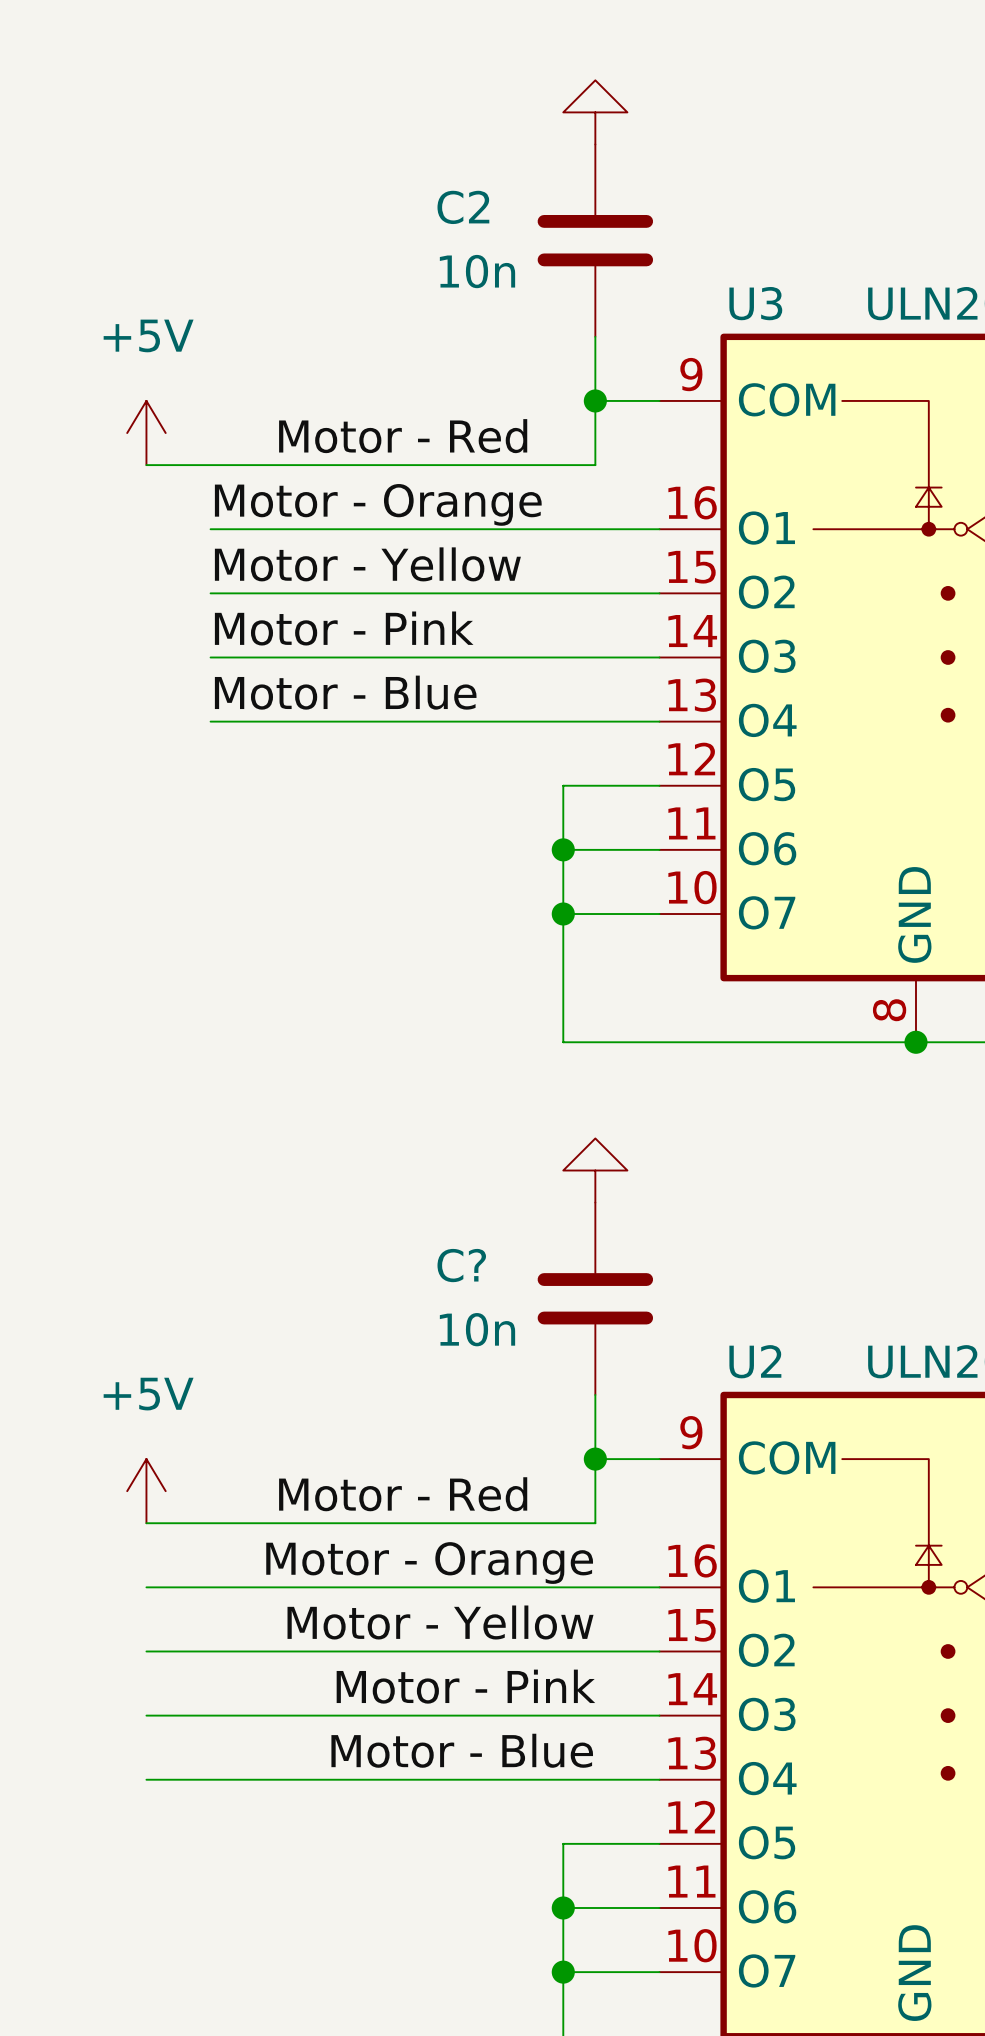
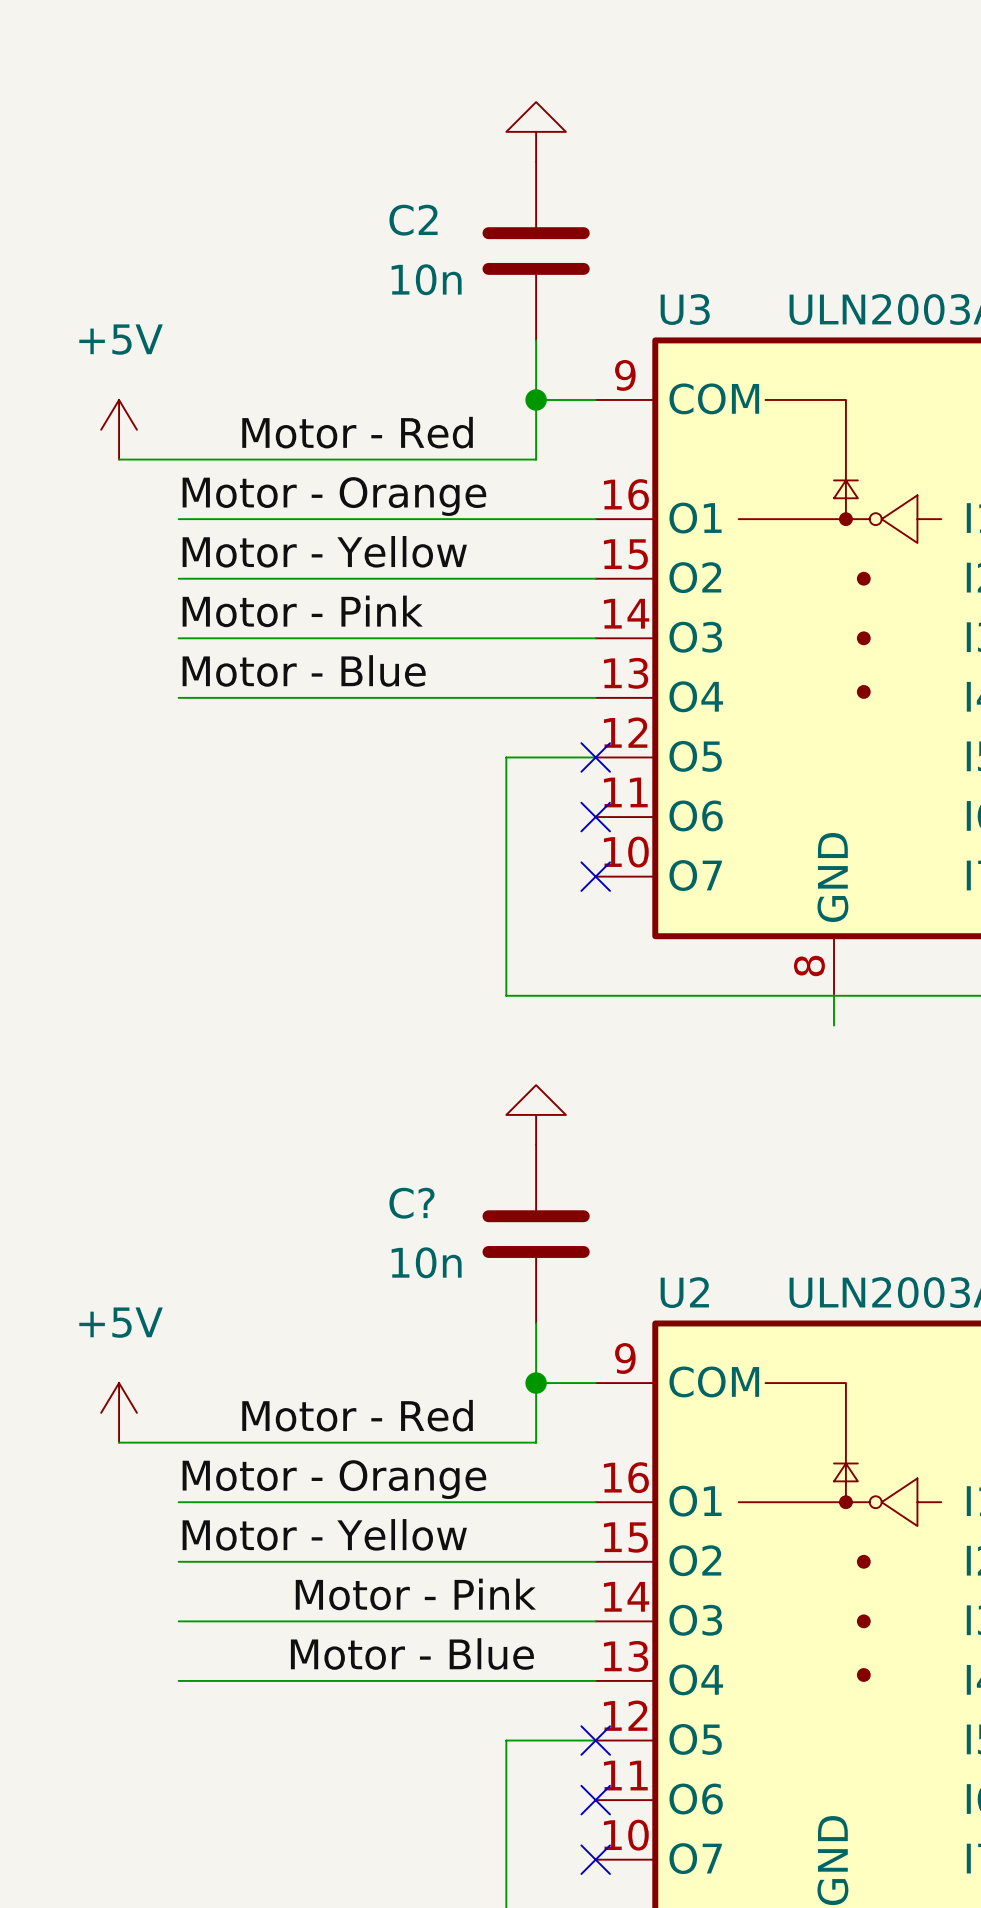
no-connect mark: none -> (595, 757)
wire: (563, 849) (659, 849) -> none
junction: (563, 849) -> none
no-connect mark: none -> (595, 817)
wire: (563, 914) (659, 914) -> none
junction: (563, 914) -> none
no-connect mark: none -> (595, 876)
wire: none -> (834, 995) (834, 1025)
junction: (915, 1042) -> none
label position: Motor - Orange (429, 1563) -> Motor - Orange (334, 1479)
wire: (146, 1587) (210, 1587) -> none
label position: Motor - Yellow (440, 1622) -> Motor - Yellow (324, 1534)
wire: (146, 1651) (210, 1651) -> none
wire: (146, 1715) (210, 1715) -> none
wire: (146, 1779) (210, 1779) -> none
no-connect mark: none -> (595, 1740)
wire: (563, 1908) (659, 1908) -> none
junction: (563, 1908) -> none
no-connect mark: none -> (595, 1800)
wire: (563, 1972) (659, 1972) -> none
junction: (563, 1972) -> none
no-connect mark: none -> (595, 1859)

